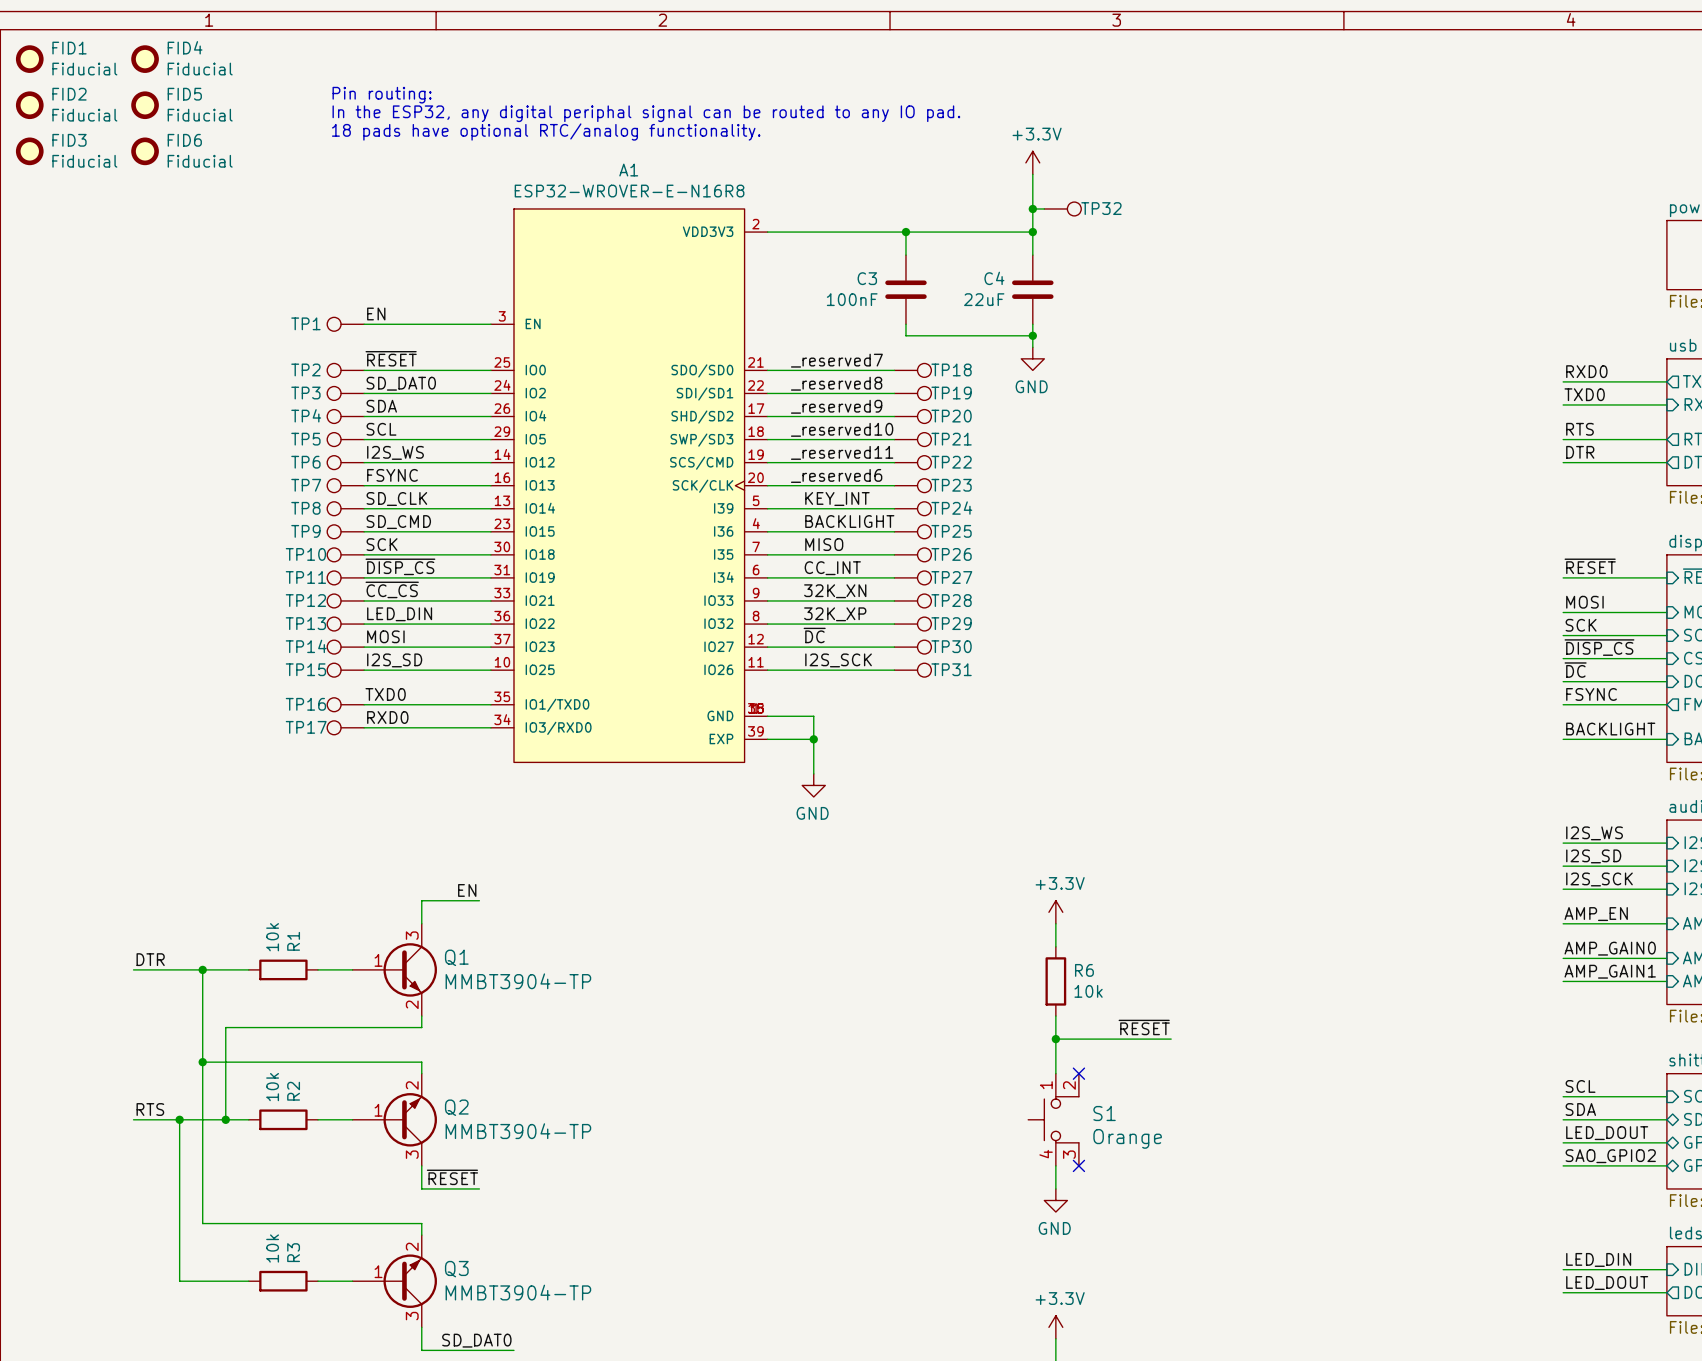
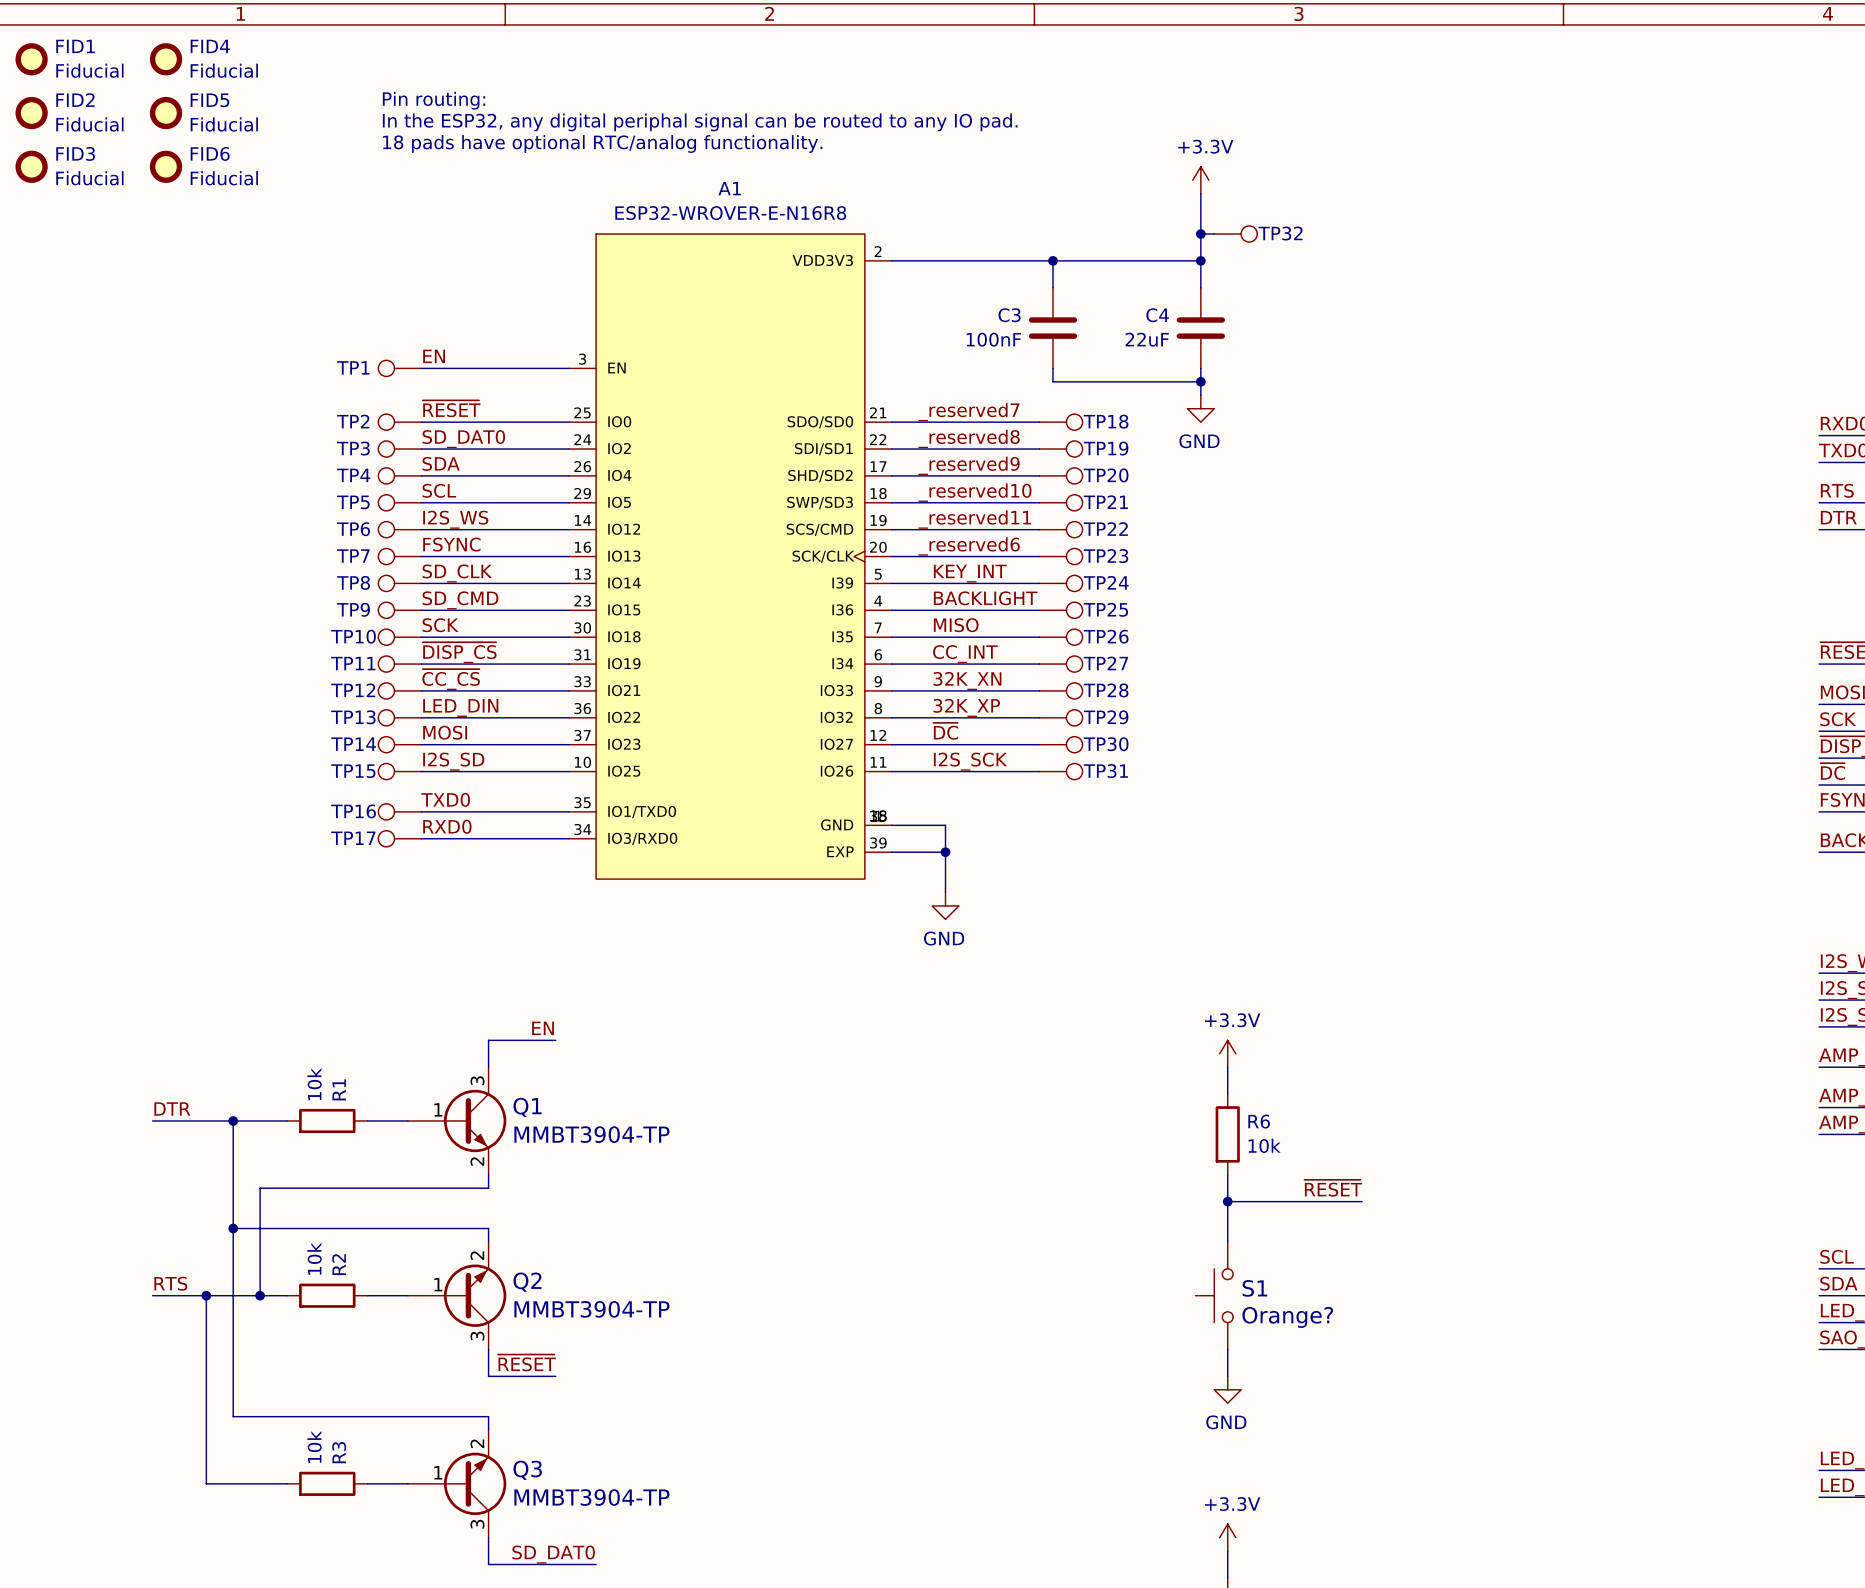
S1 symbol: [1028, 1073, 1079, 1166] -> [1195, 1241, 1234, 1350]
no-connect mark: (1078, 1073) -> none
S1 value: Orange (1127, 1138) -> Orange? (1287, 1317)
no-connect mark: (1078, 1165) -> none

